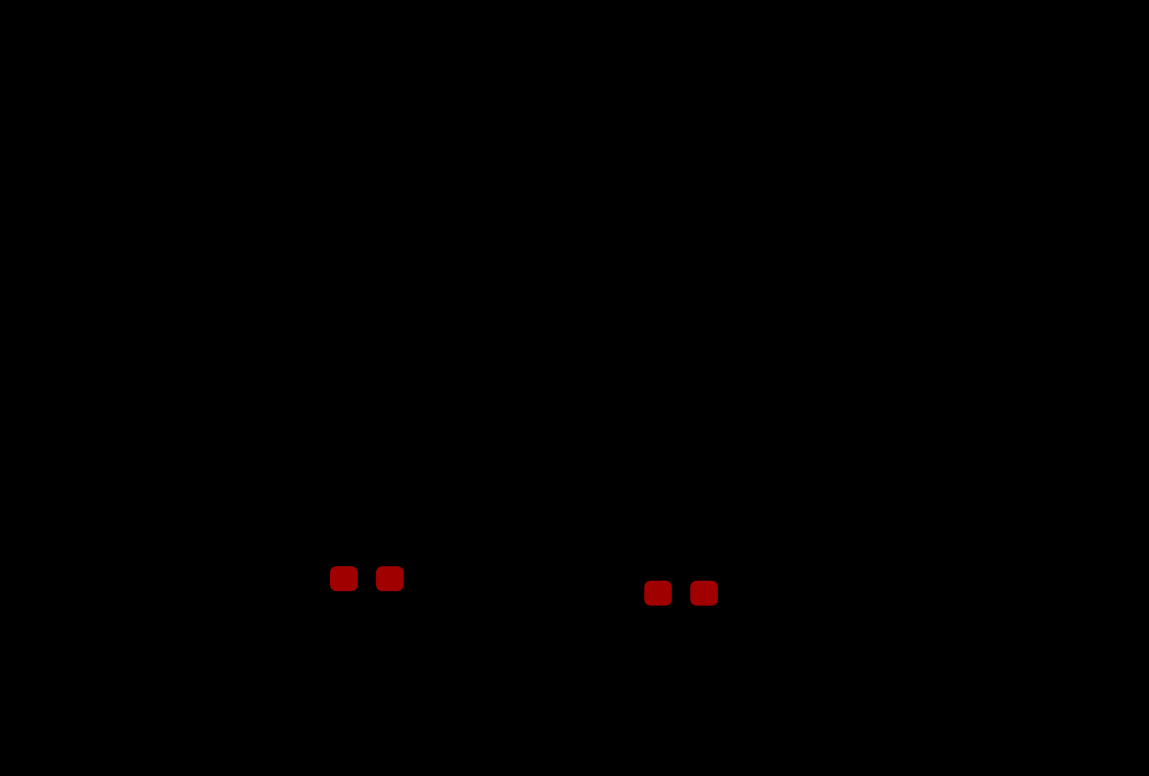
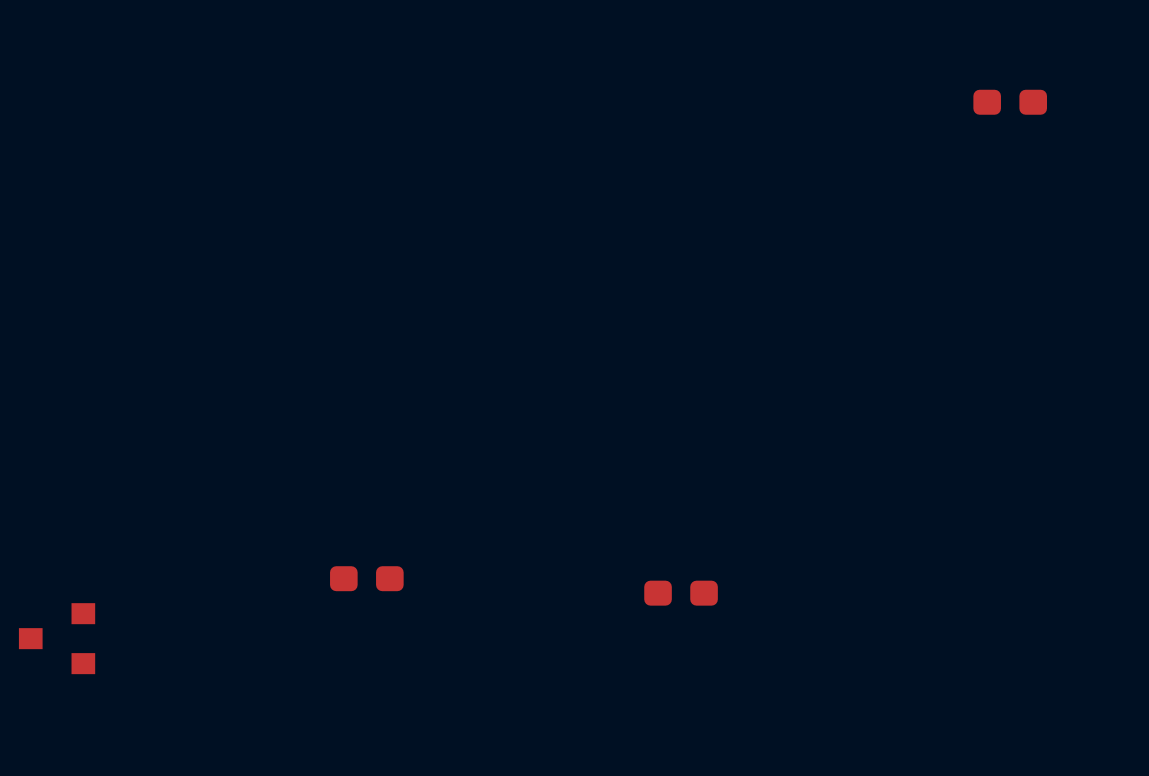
part: none -> (1010, 102)
part: none -> (57, 638)

